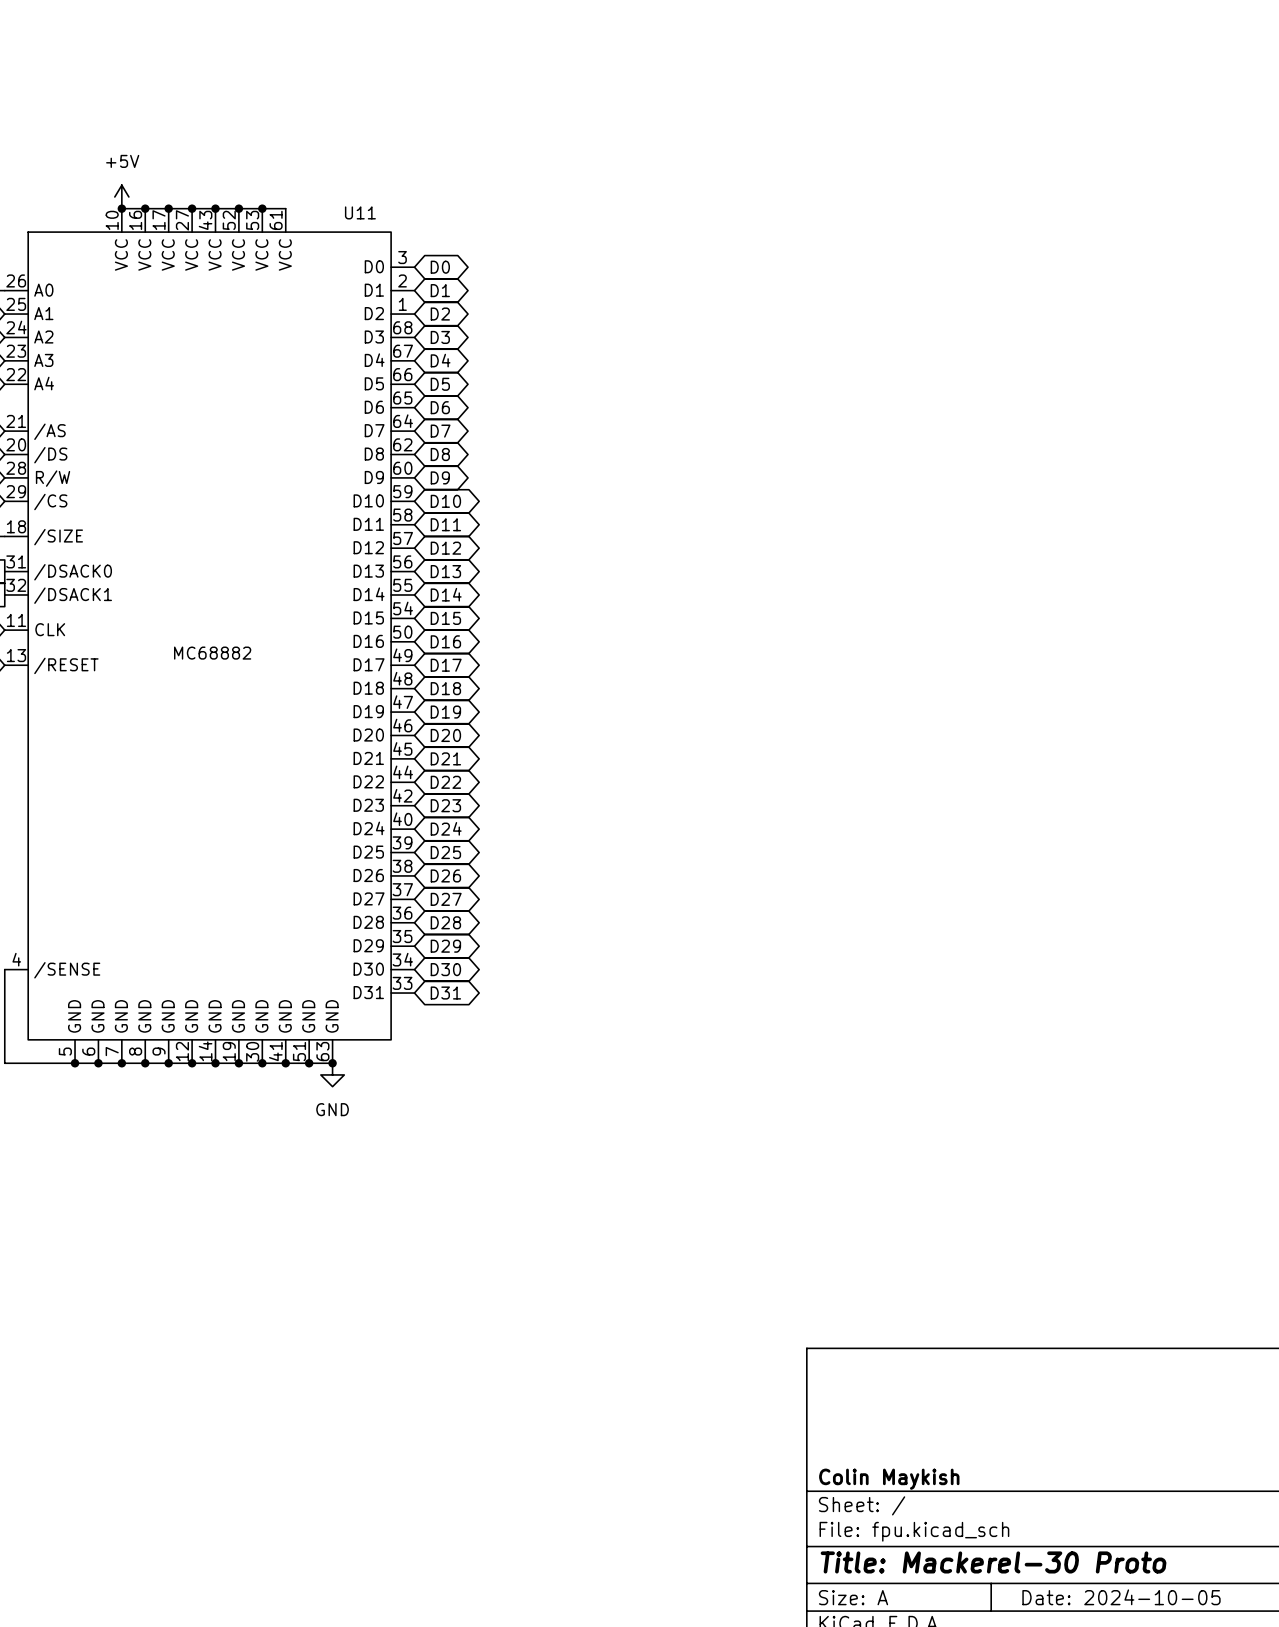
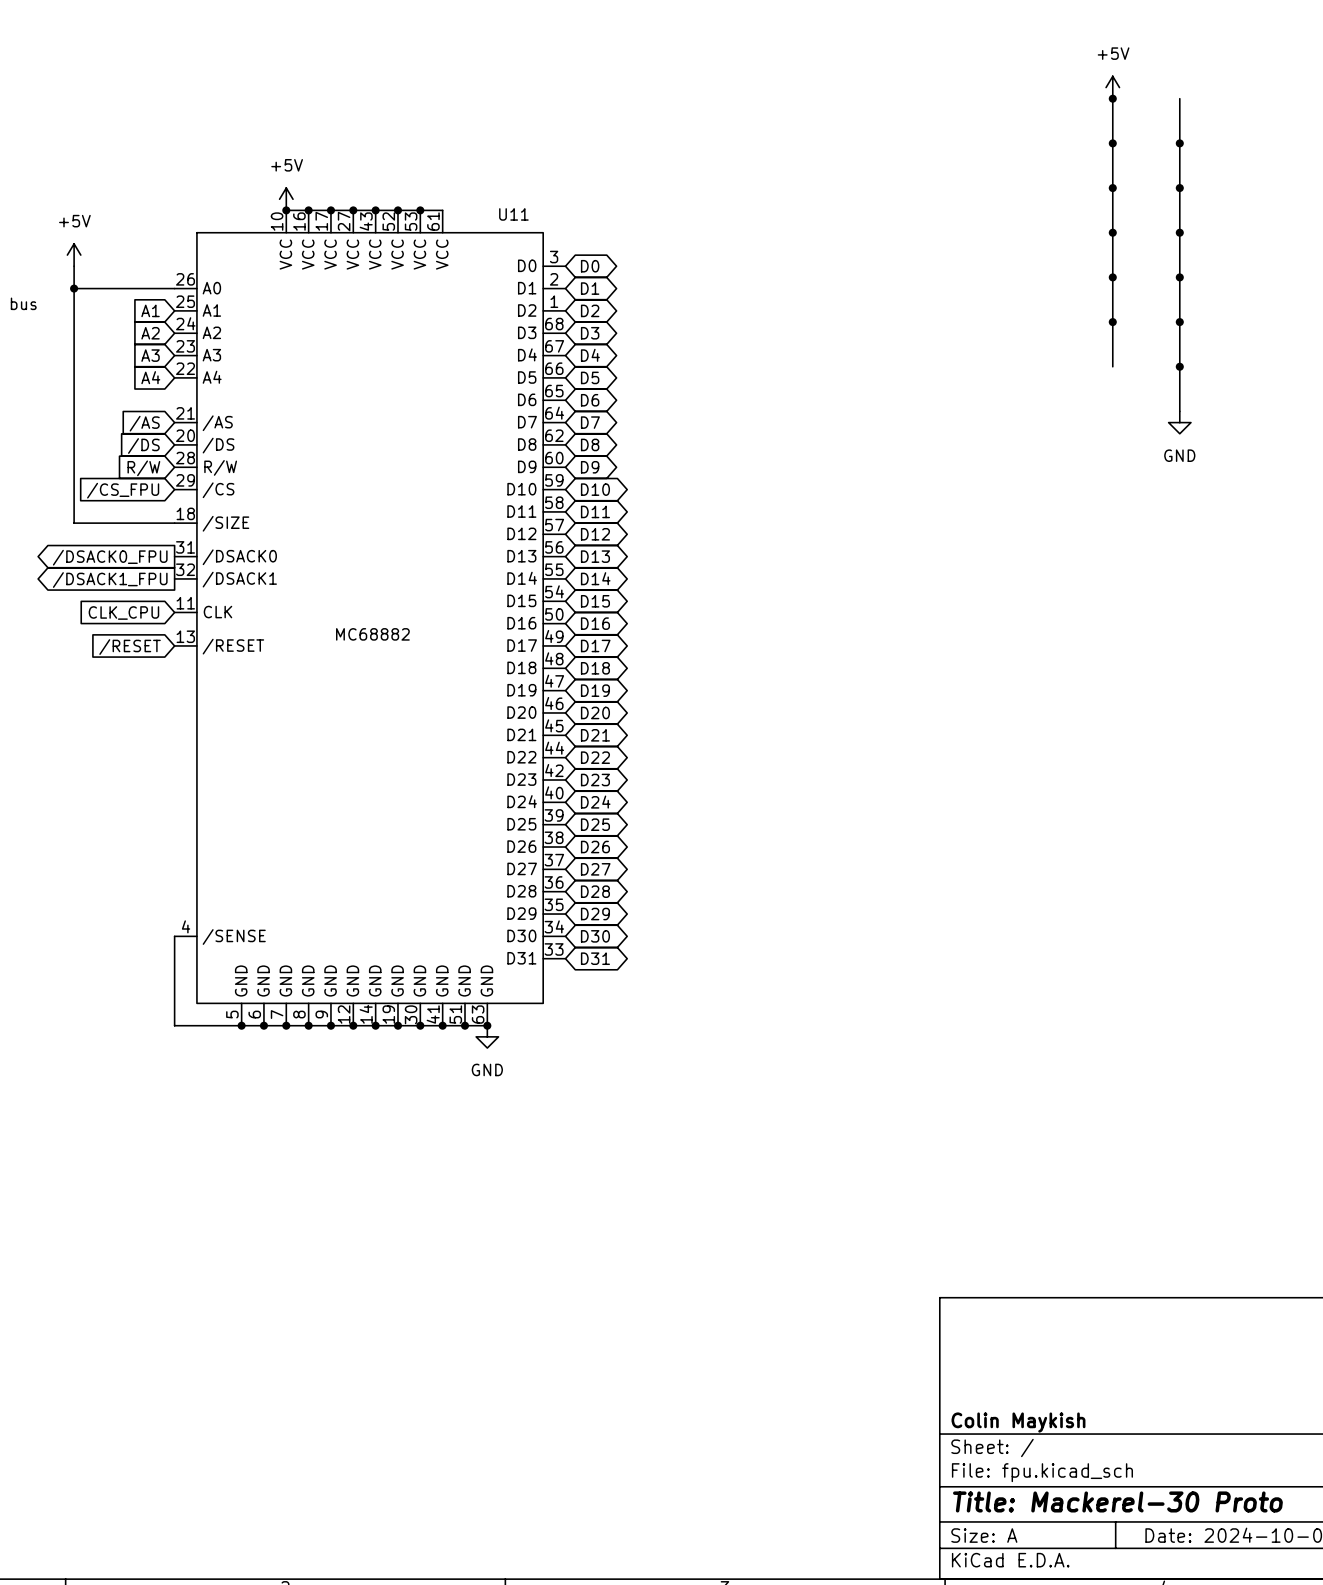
power symbol: none -> +5V (1112, 87)
wire: none -> (1112, 98) (1112, 366)
junction: none -> (1112, 98)
wire: none -> (1179, 98) (1179, 411)
junction: none -> (1112, 143)
junction: none -> (1179, 143)
junction: none -> (1112, 188)
junction: none -> (1179, 188)
junction: none -> (1112, 232)
junction: none -> (1179, 232)
junction: none -> (1112, 277)
junction: none -> (1179, 277)
junction: none -> (1112, 322)
junction: none -> (1179, 322)
junction: none -> (1179, 366)
power symbol: none -> GND (1179, 422)

